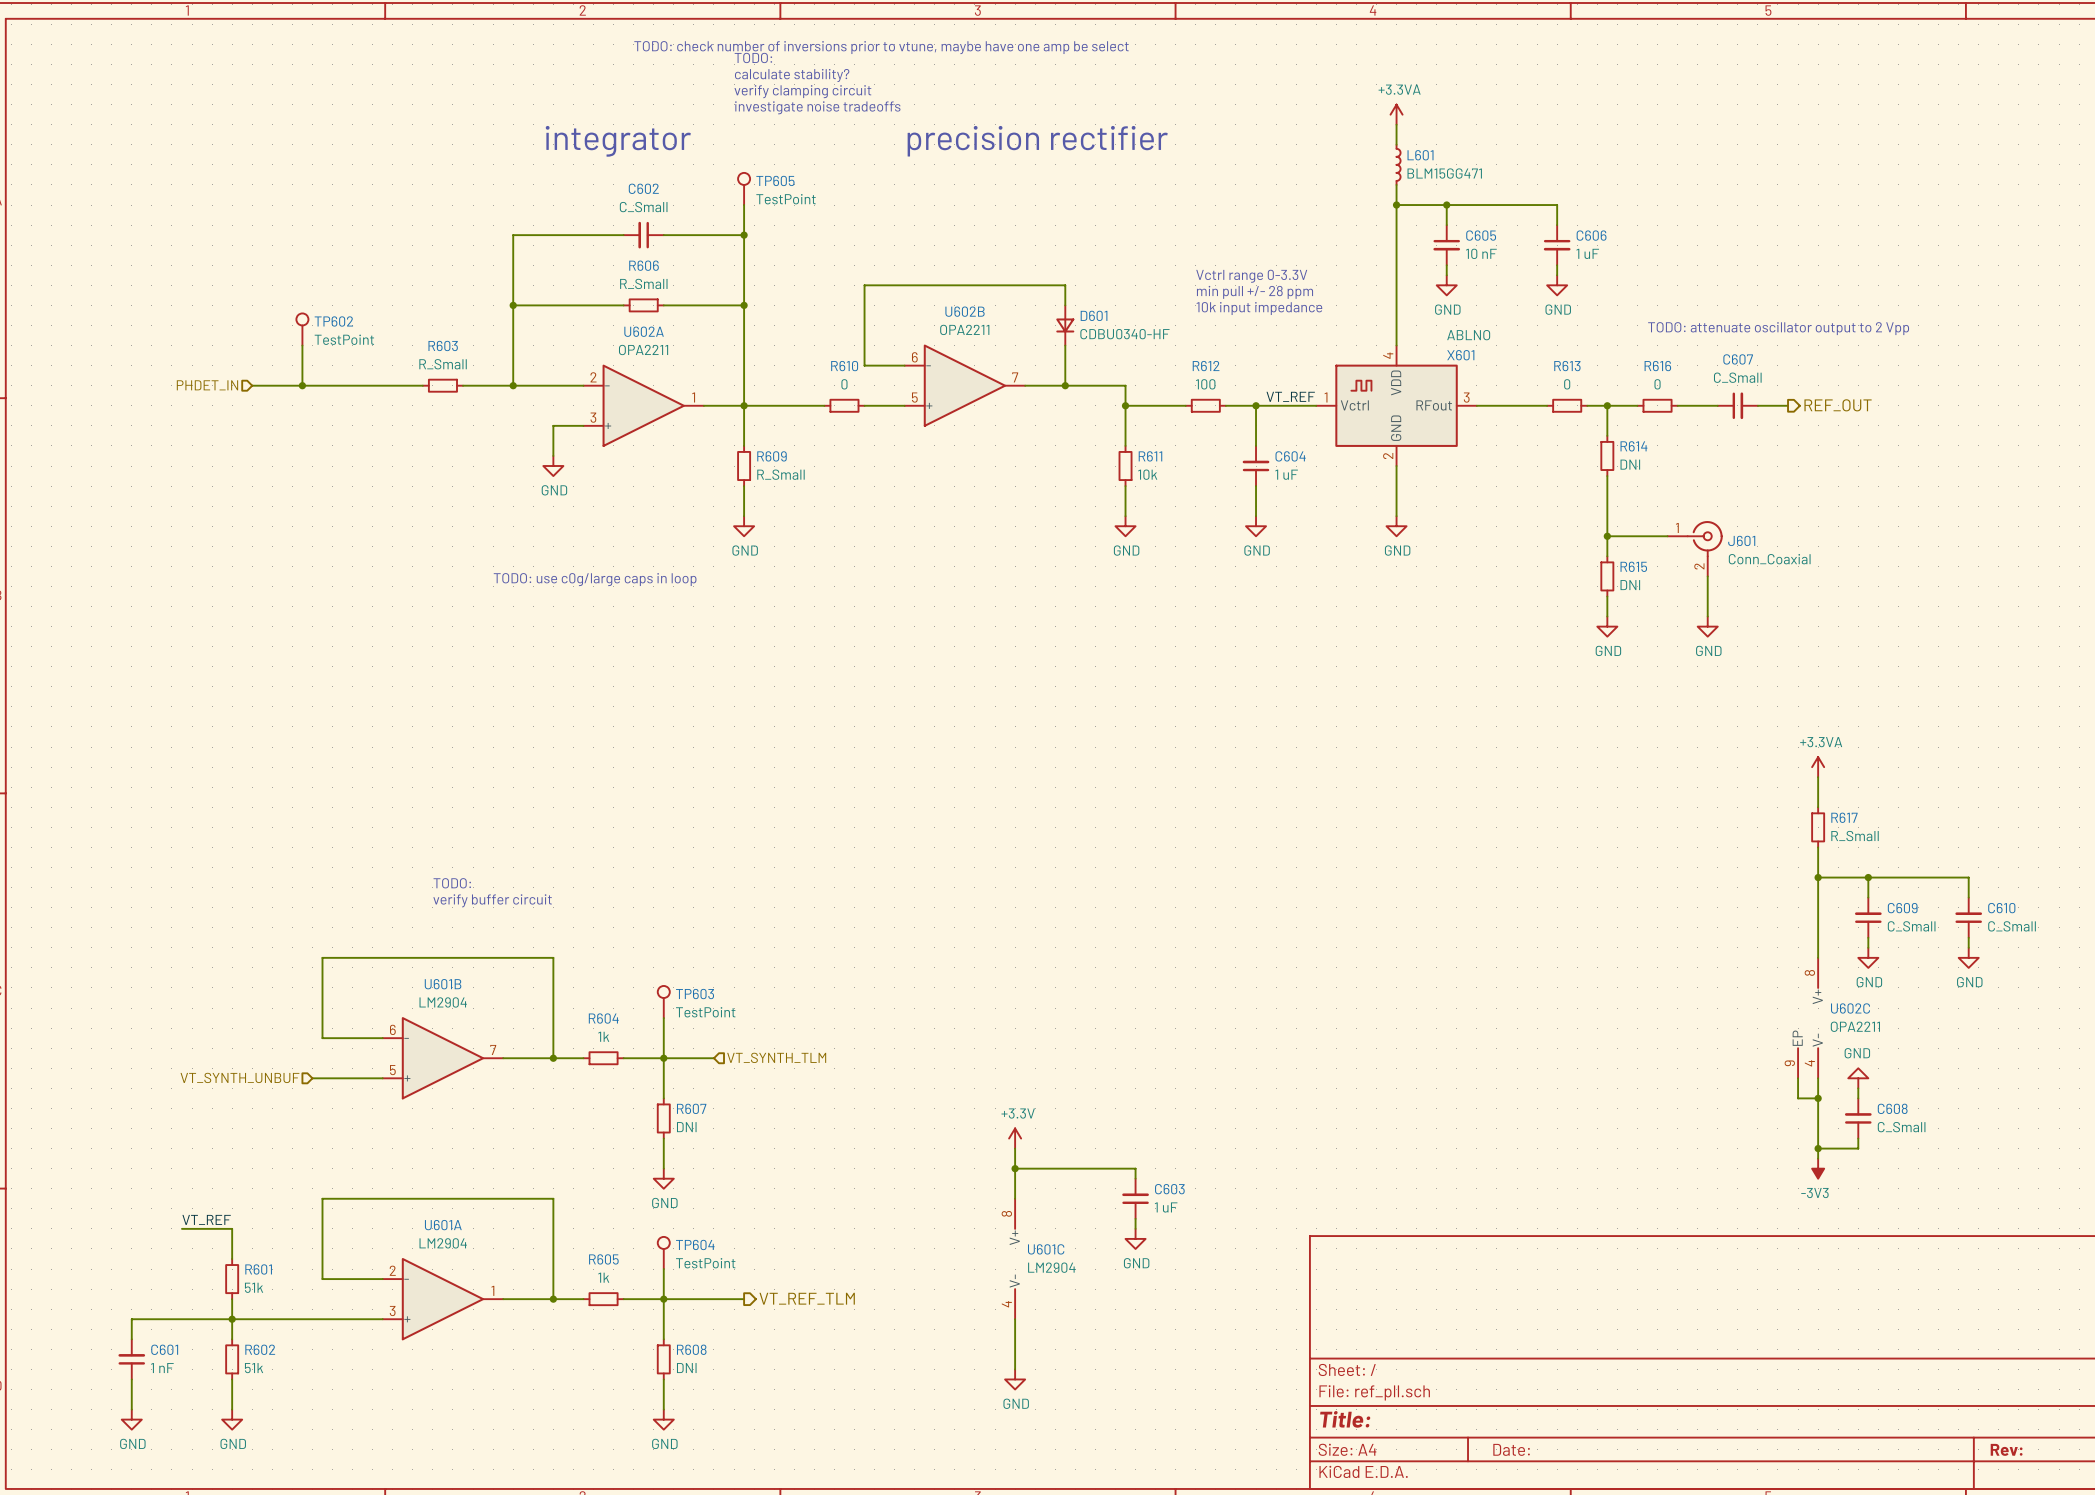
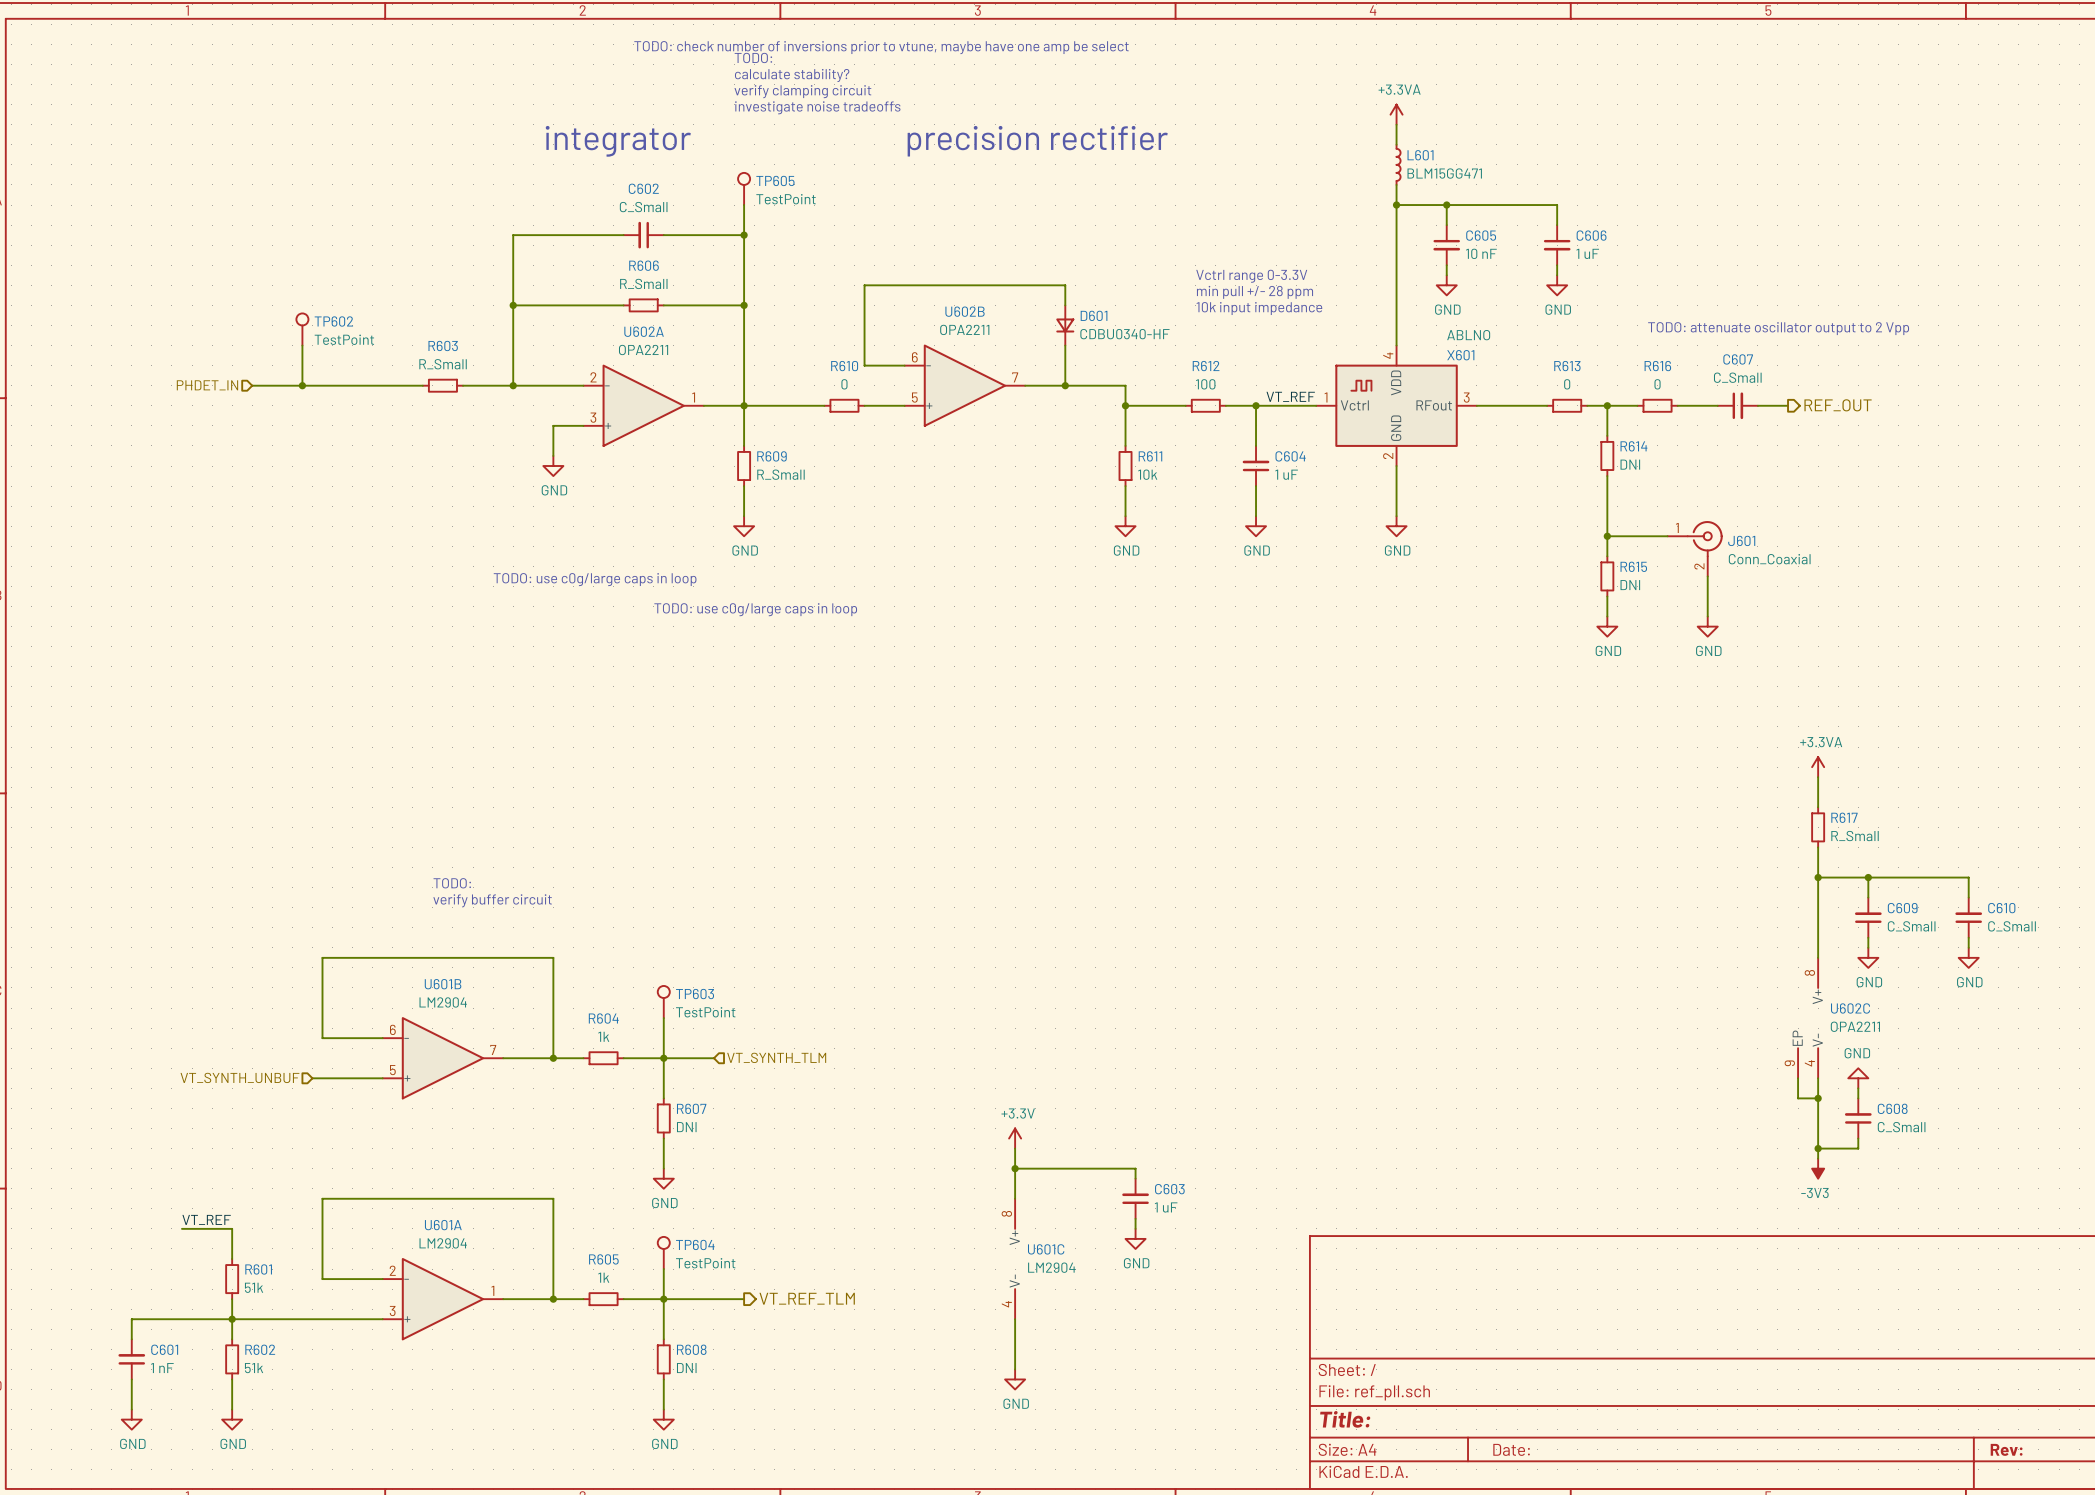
text: none -> TODO: use c0g/large caps in loop (755, 609)

